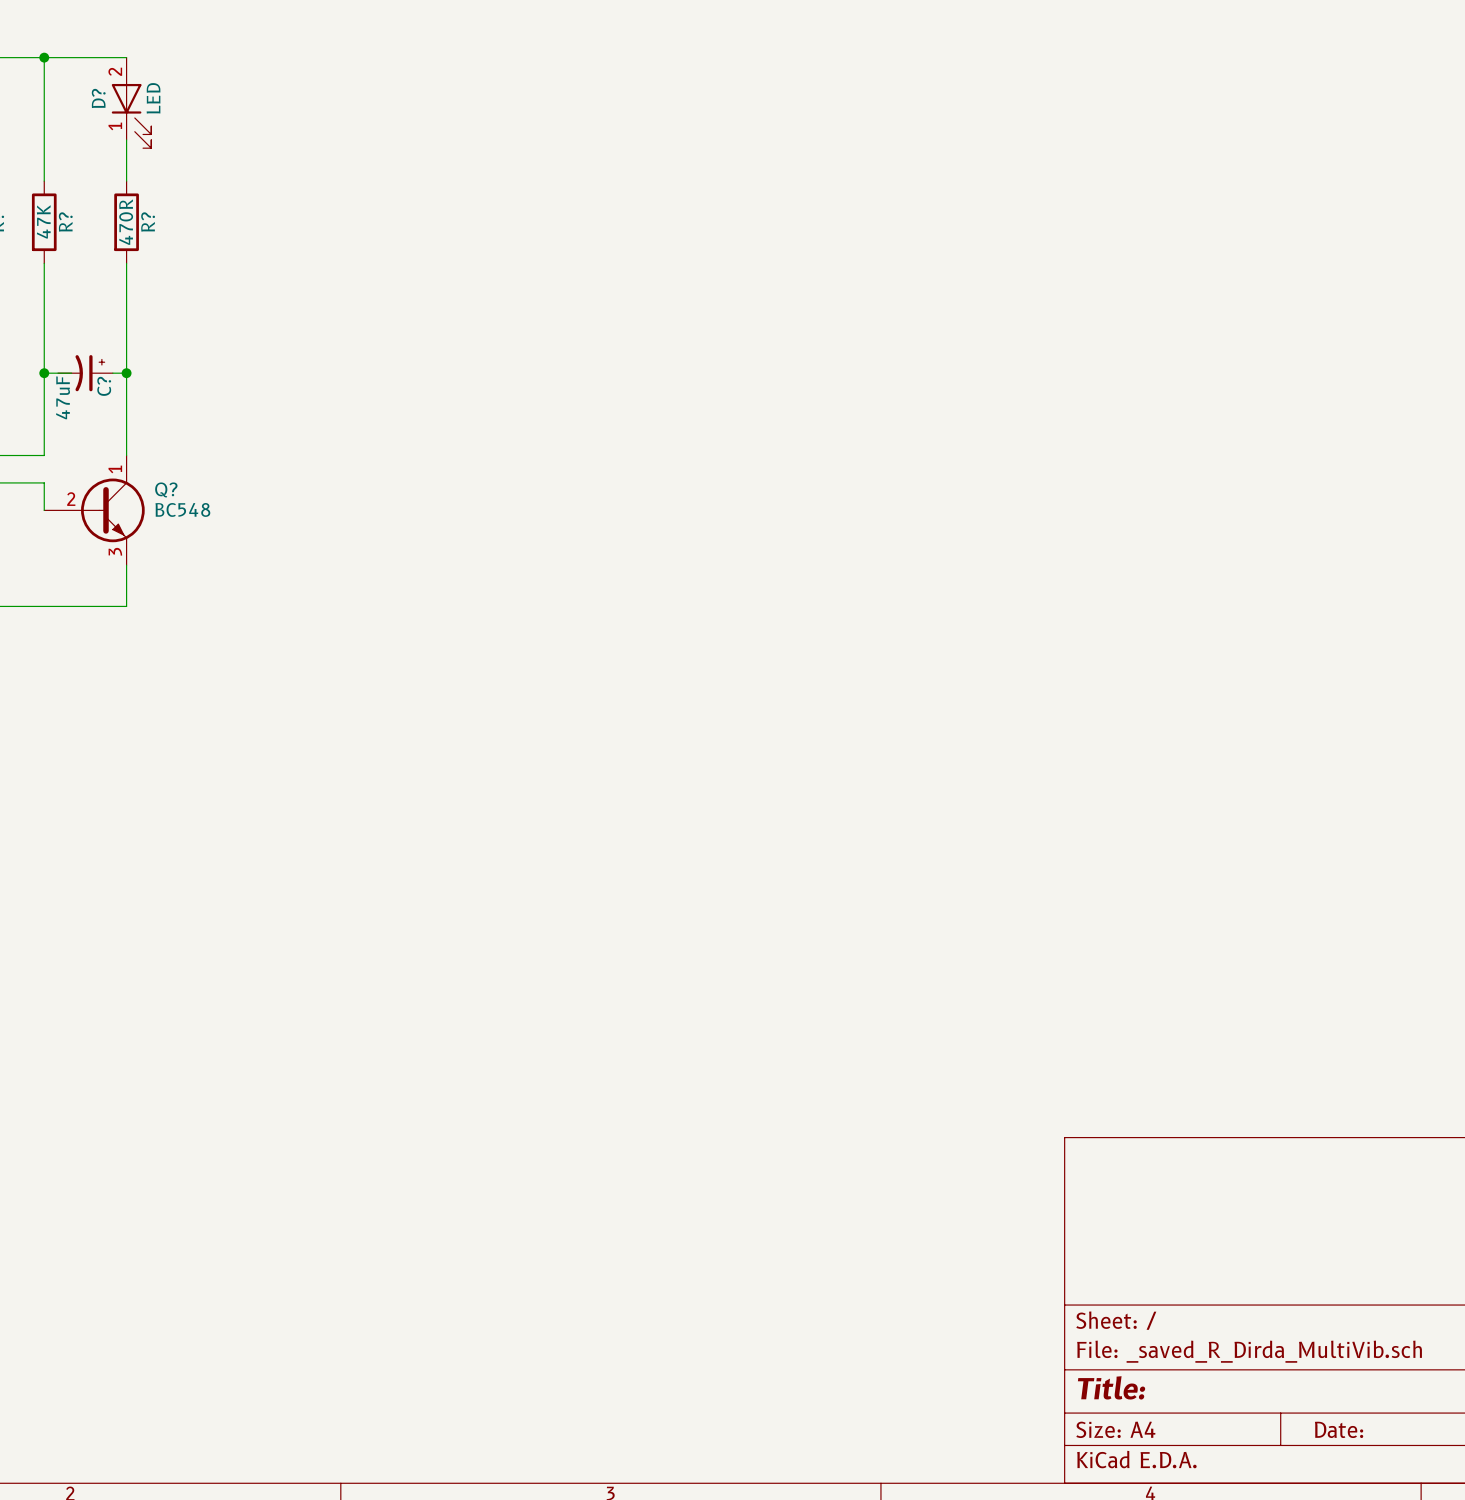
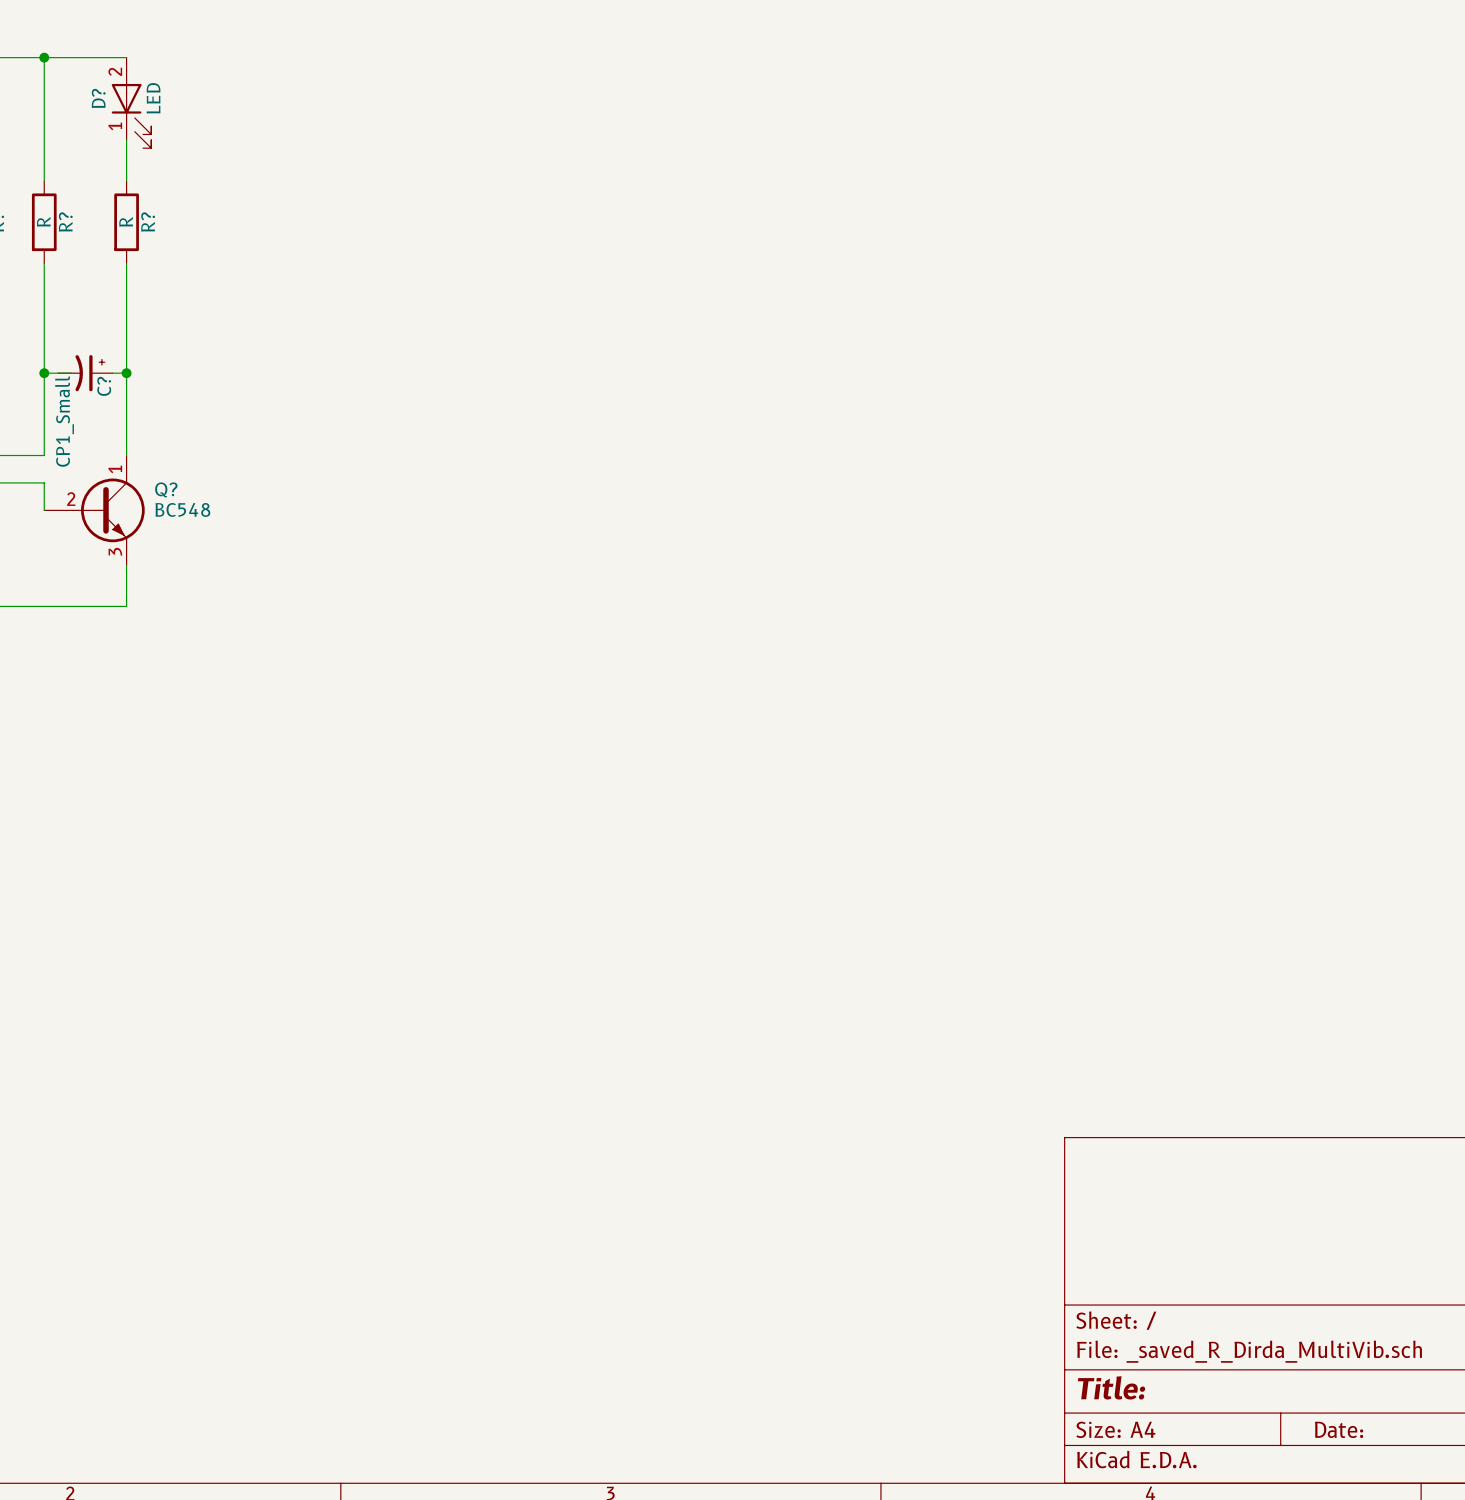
R? value: 47K (43, 221) -> R (43, 221)
R? value: 470R (126, 222) -> R (126, 221)
C? value: 47uF (63, 397) -> CP1_Small (64, 421)

